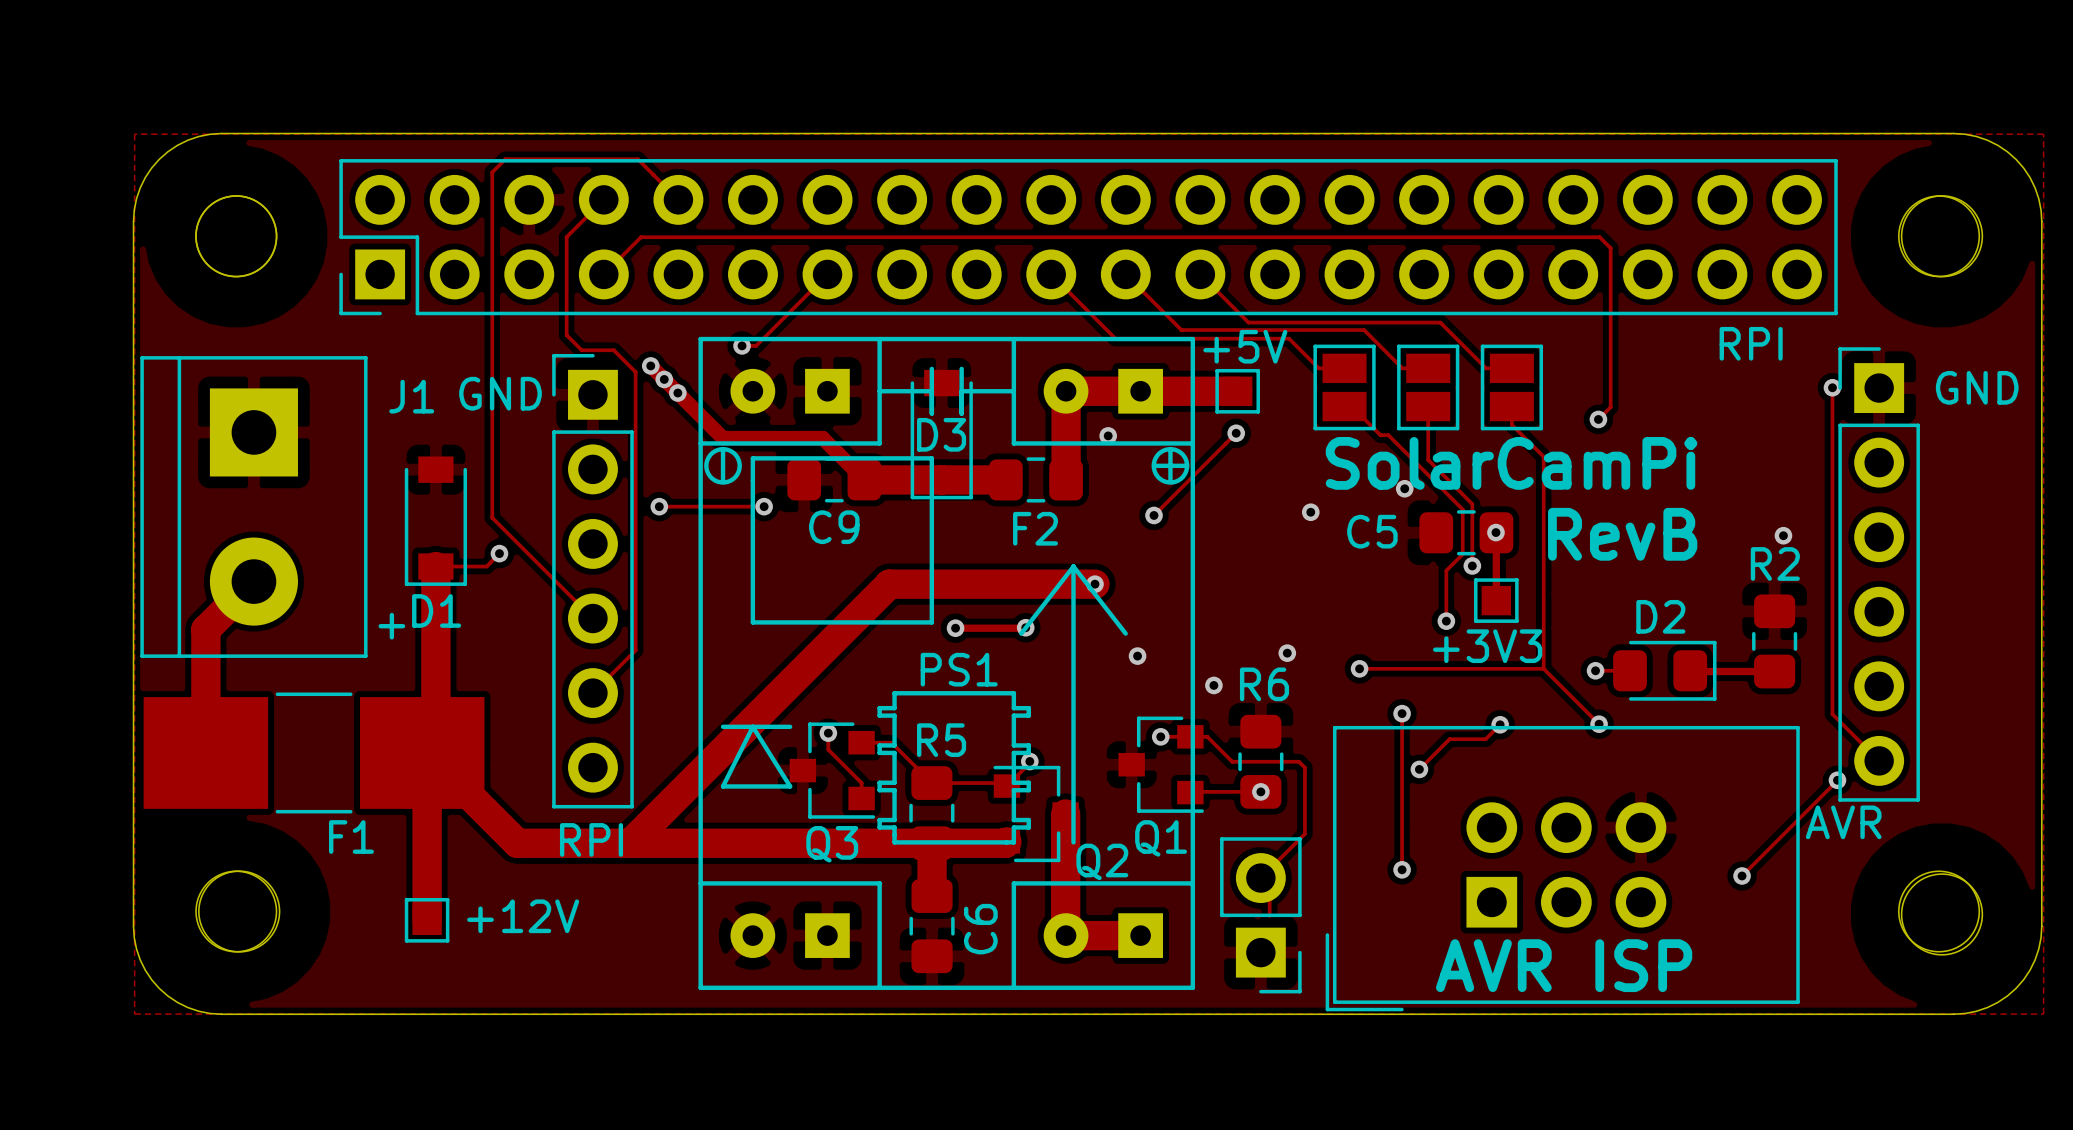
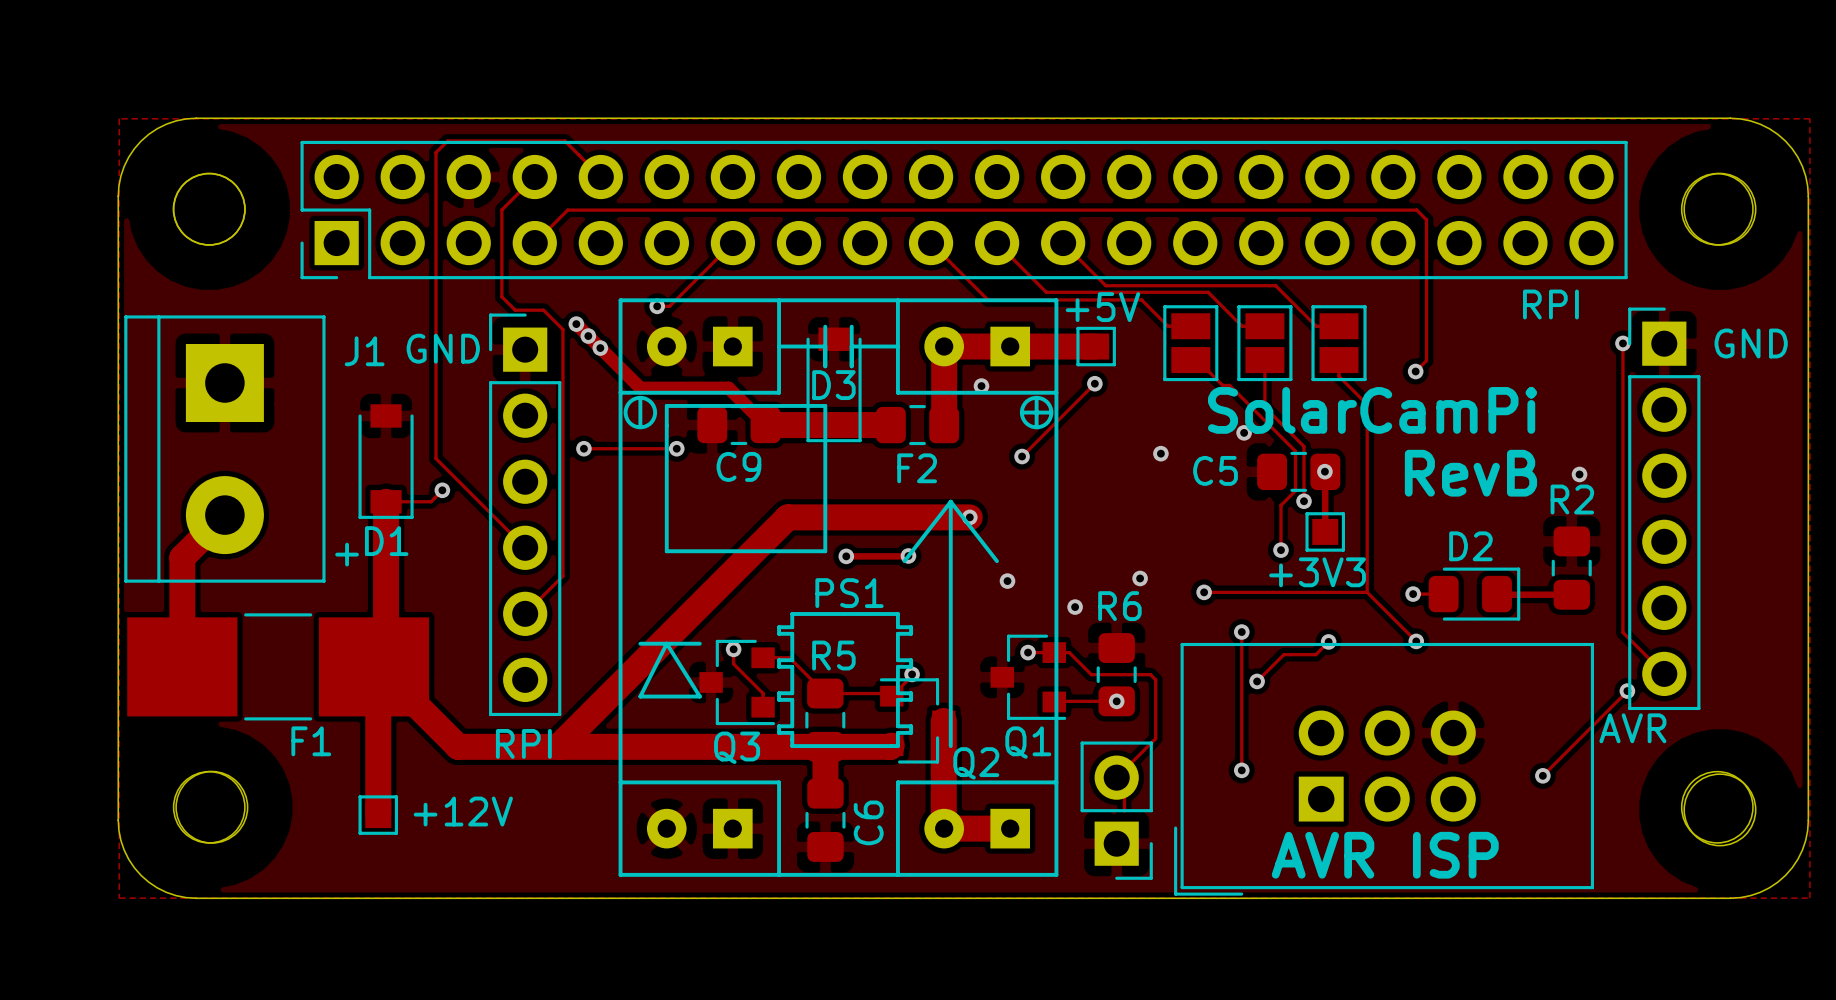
text position: SolarCamPi (1511, 463) -> SolarCamPi (1372, 410)
text position: RevB (1622, 534) -> RevB (1470, 473)

